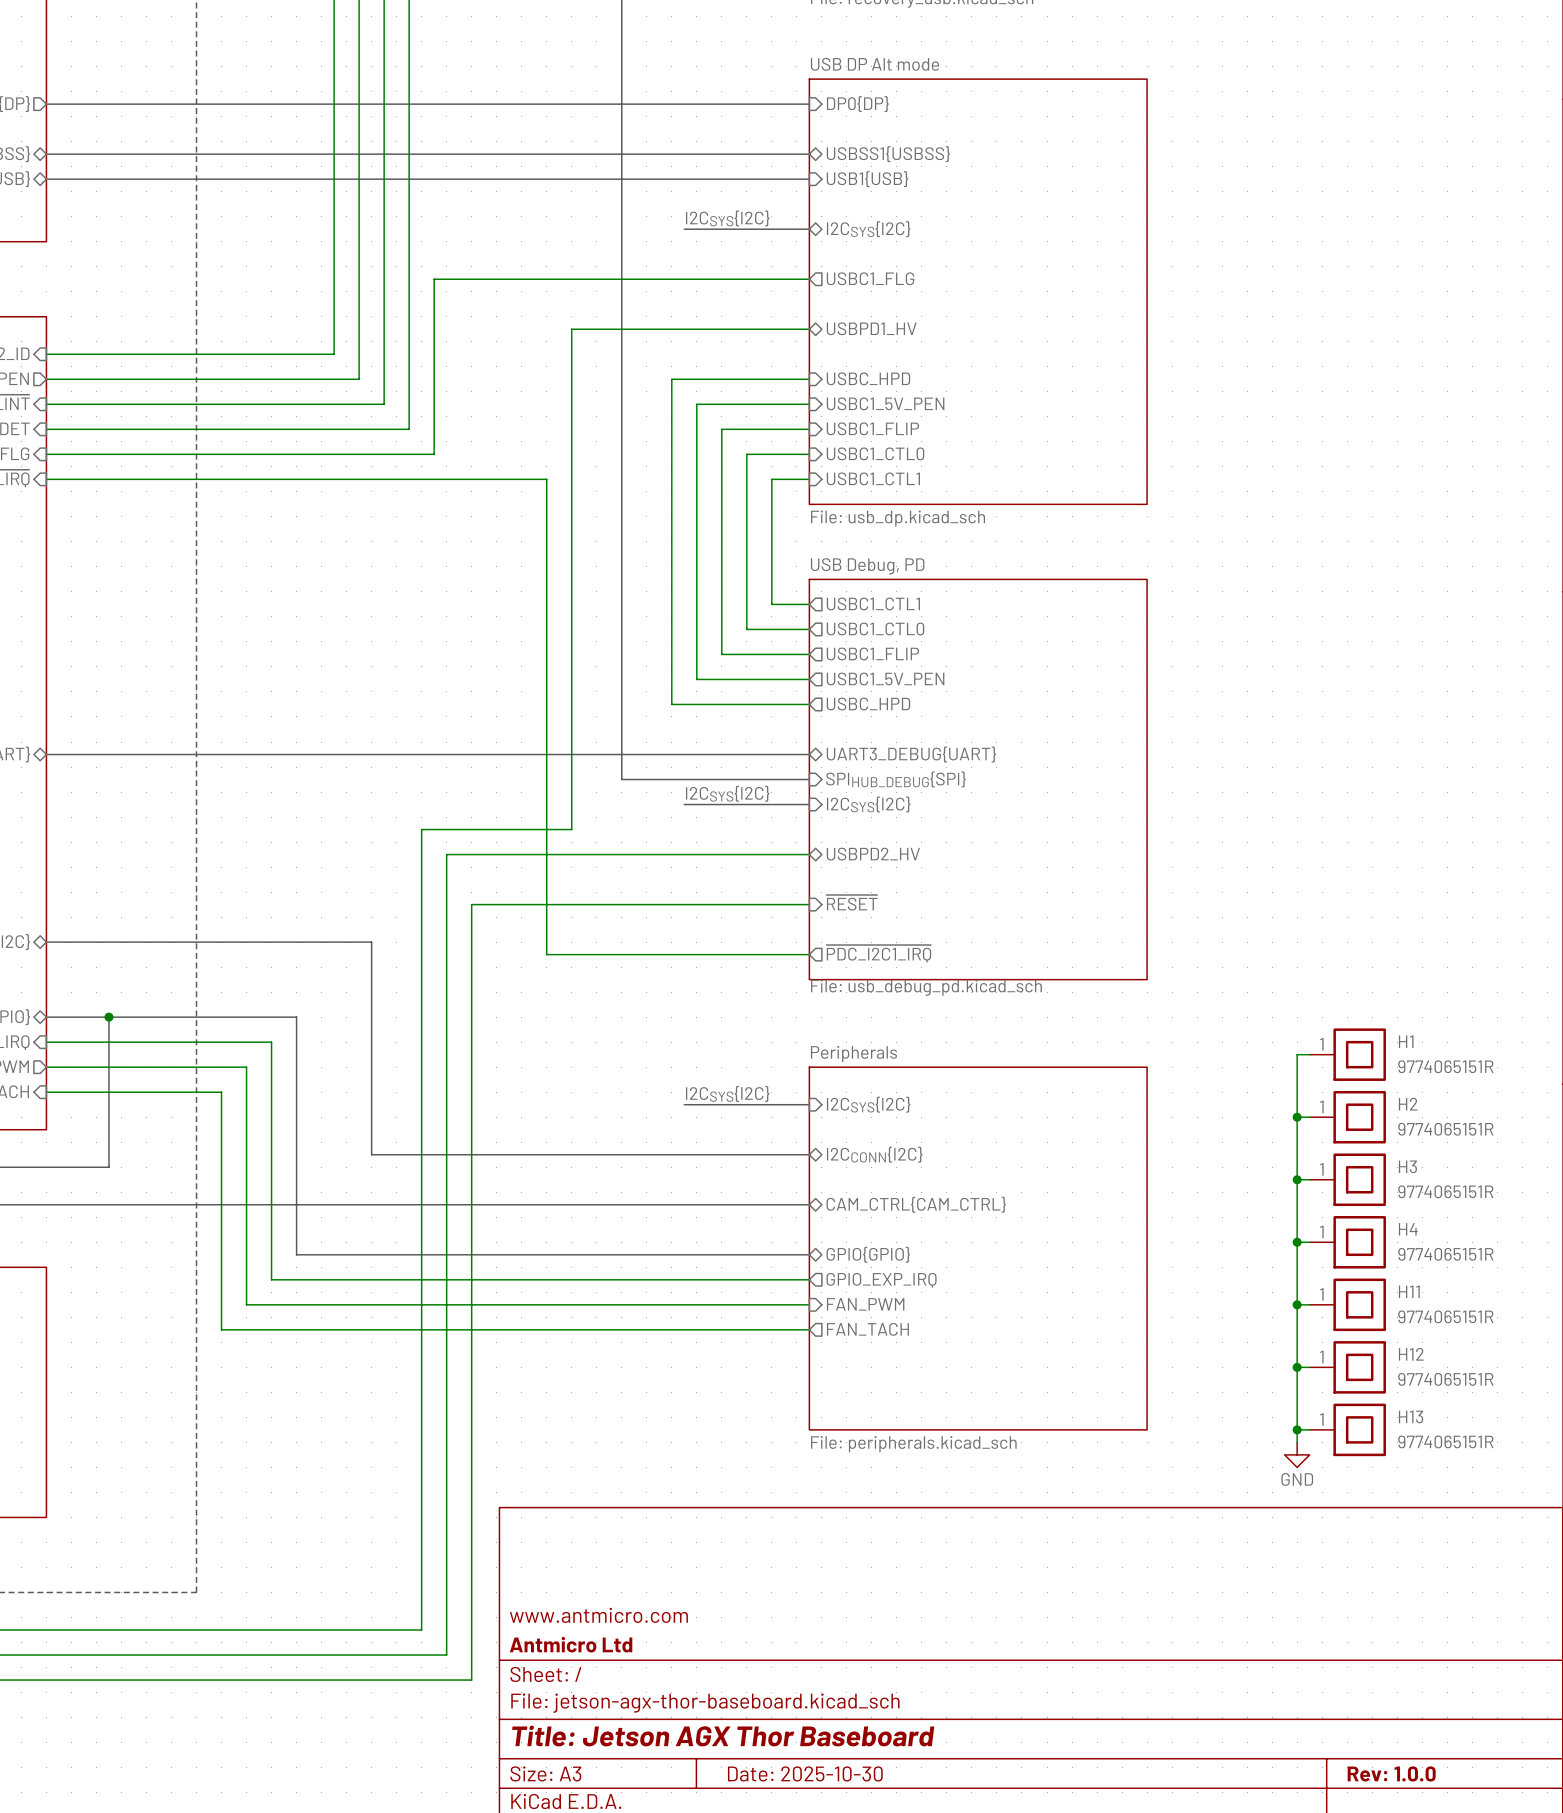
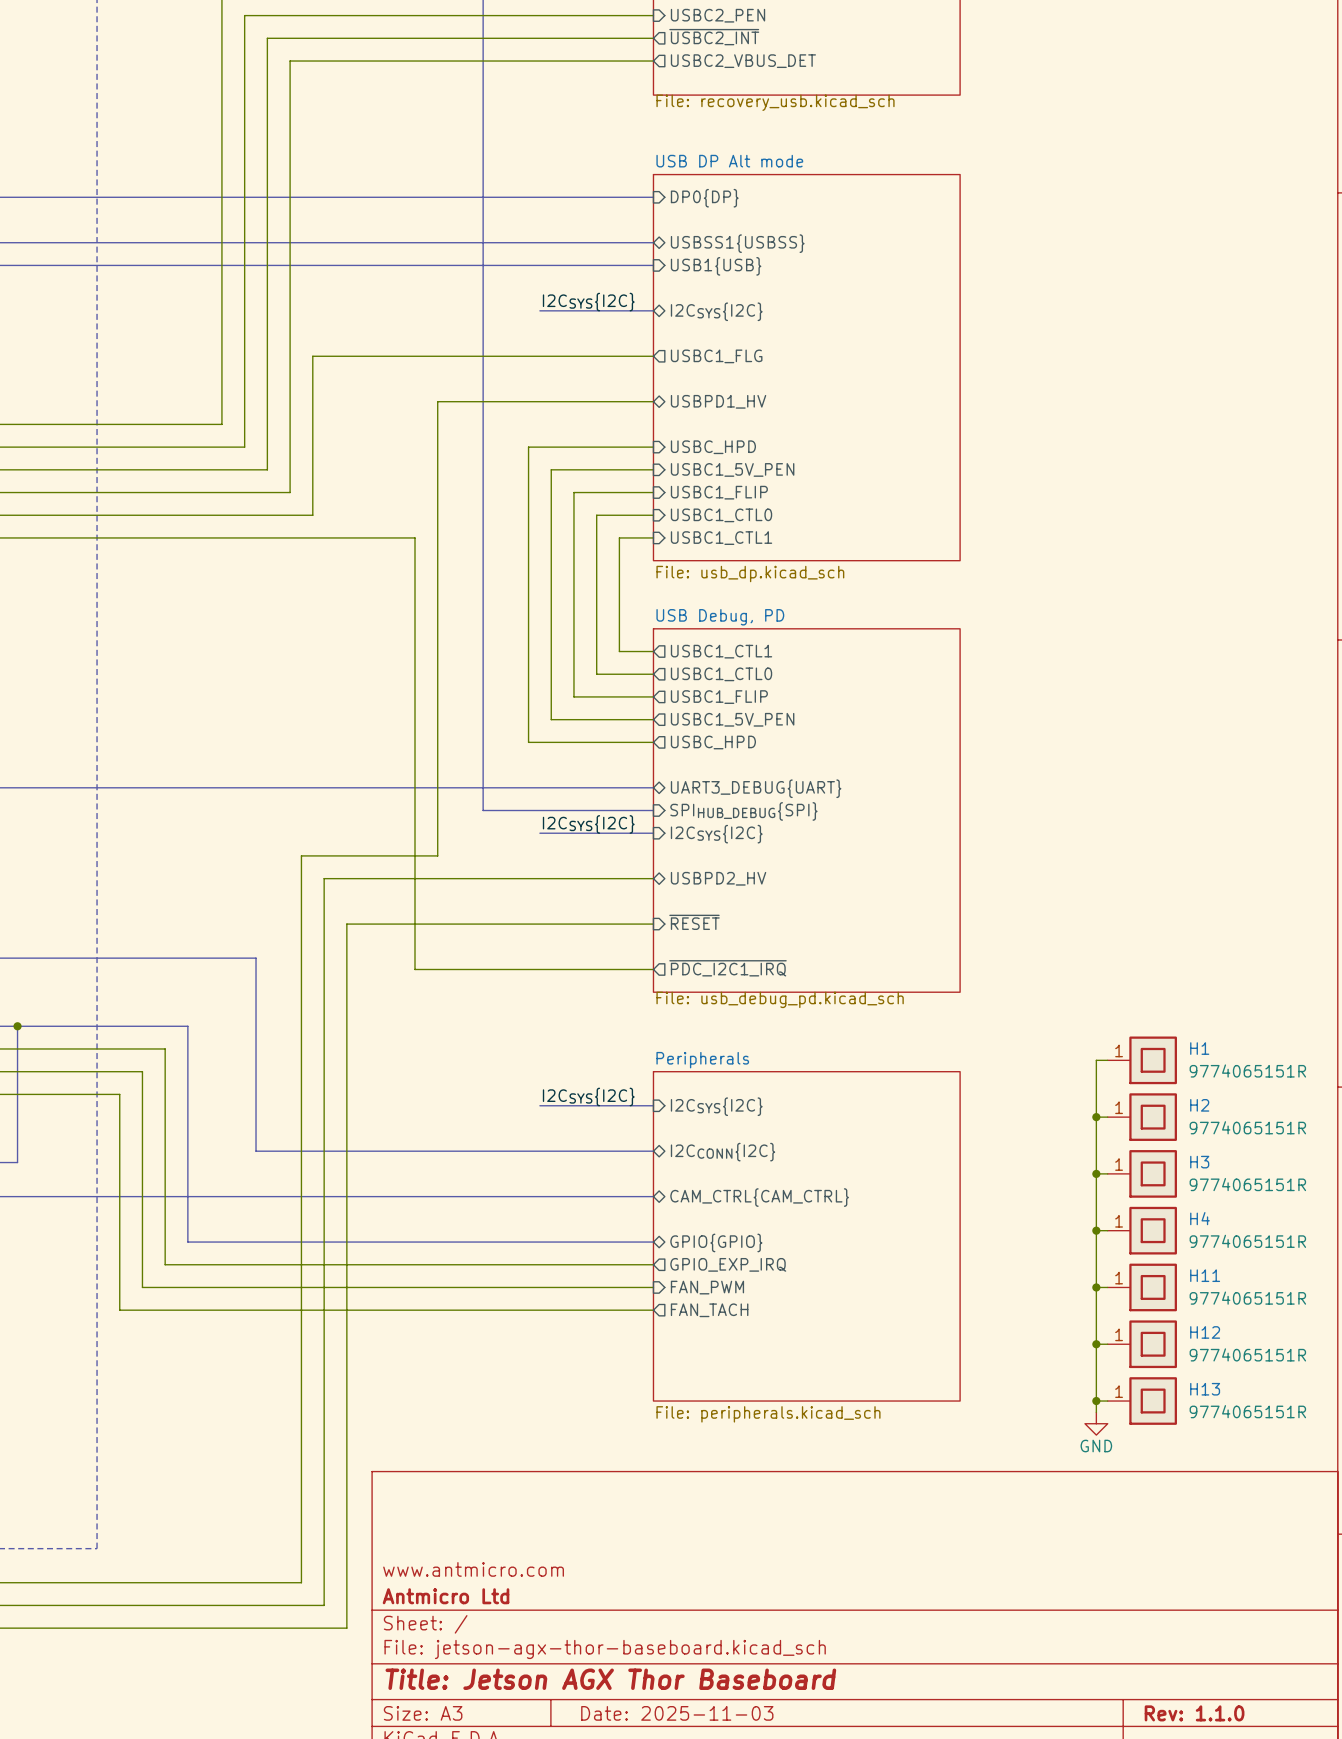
title block: Date: 2025-10-30 (805, 1773) -> Date: 2025-11-03 (677, 1713)
title block: Rev: 1.0.0 (1391, 1773) -> Rev: 1.1.0 (1194, 1713)

